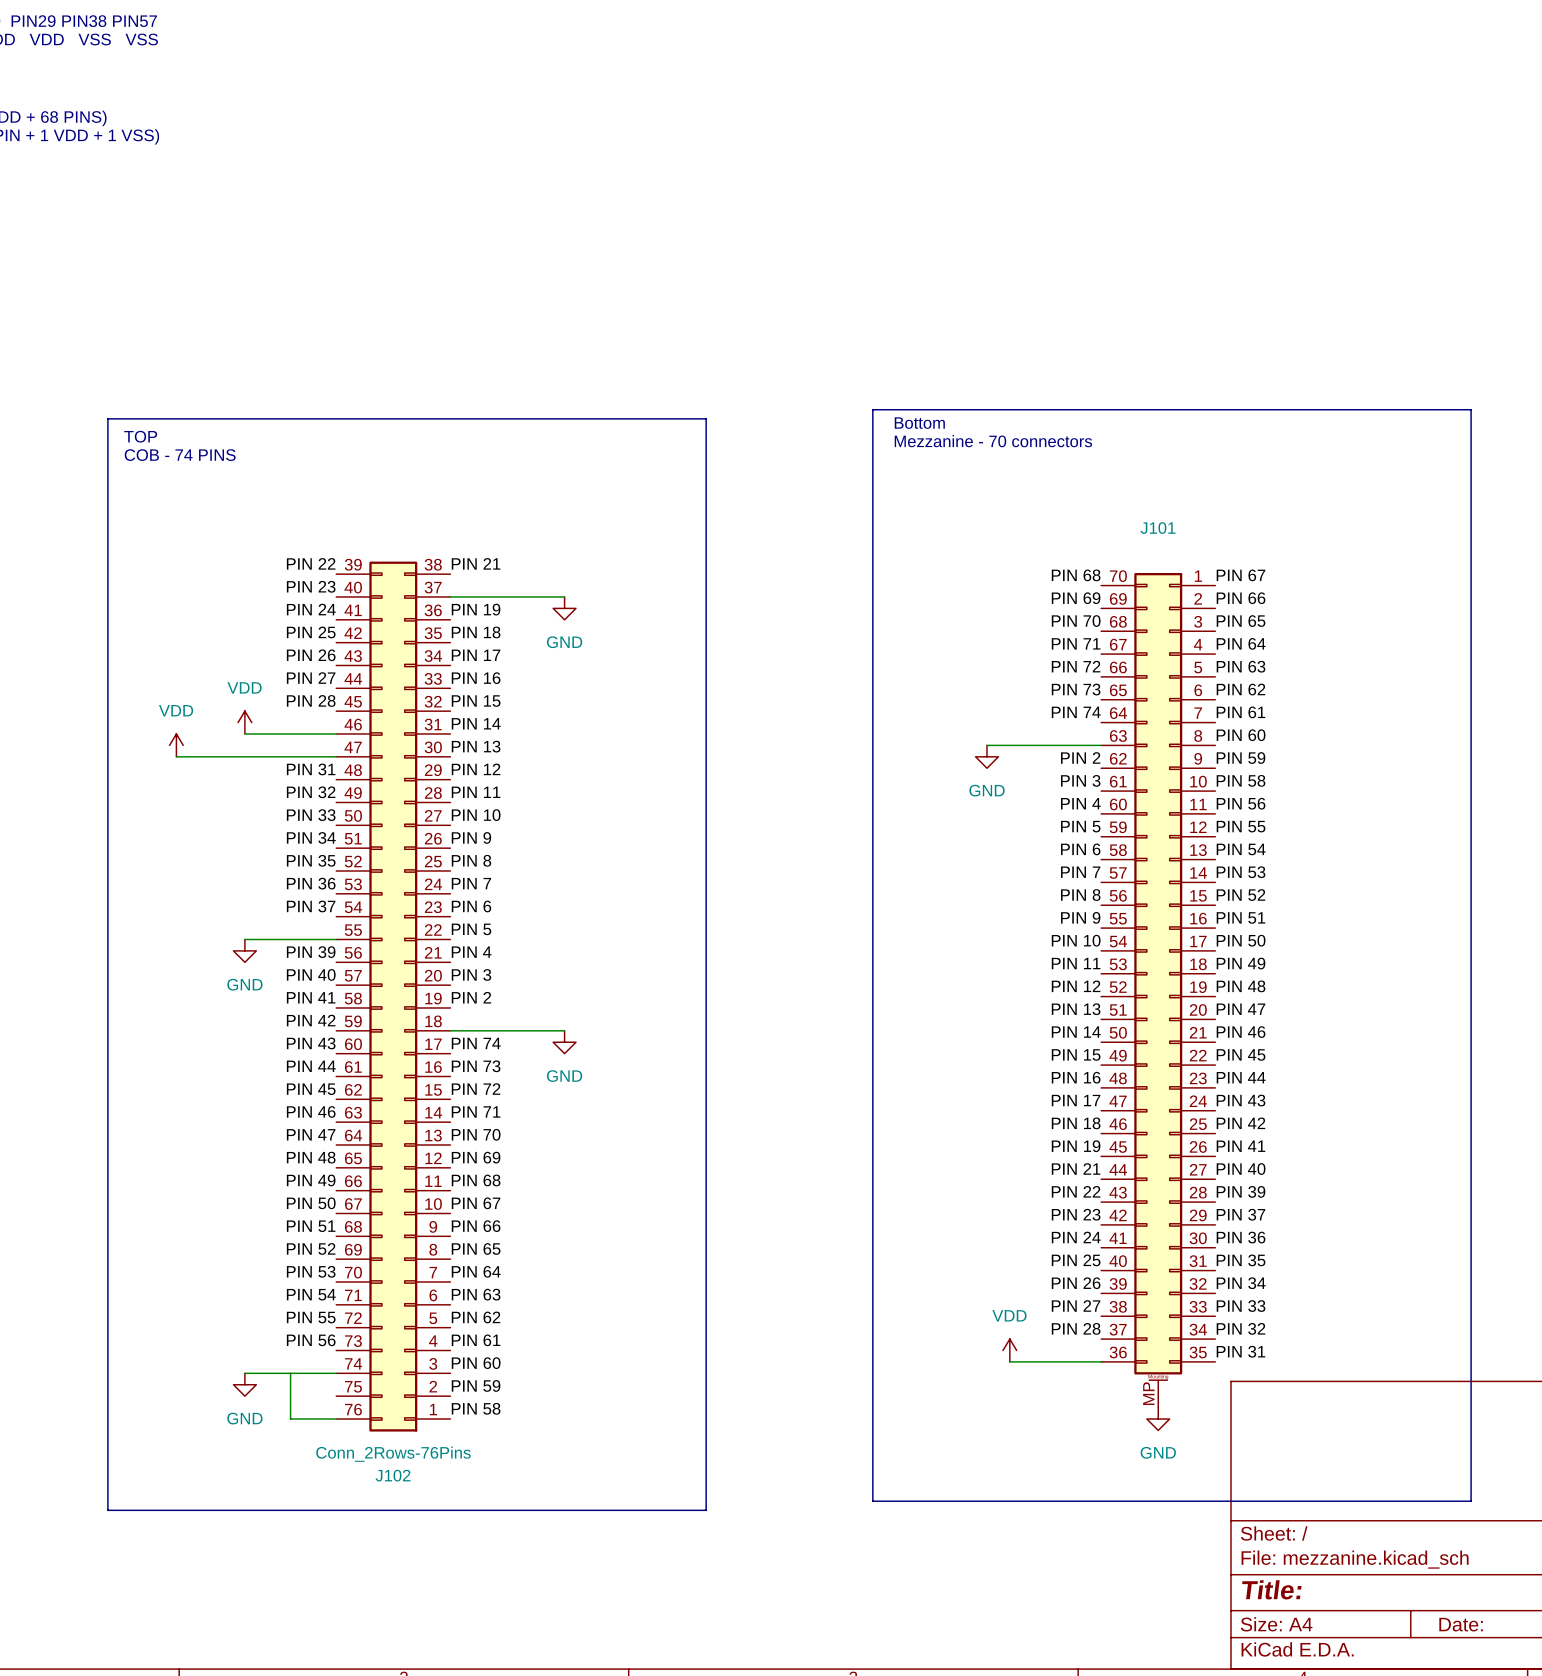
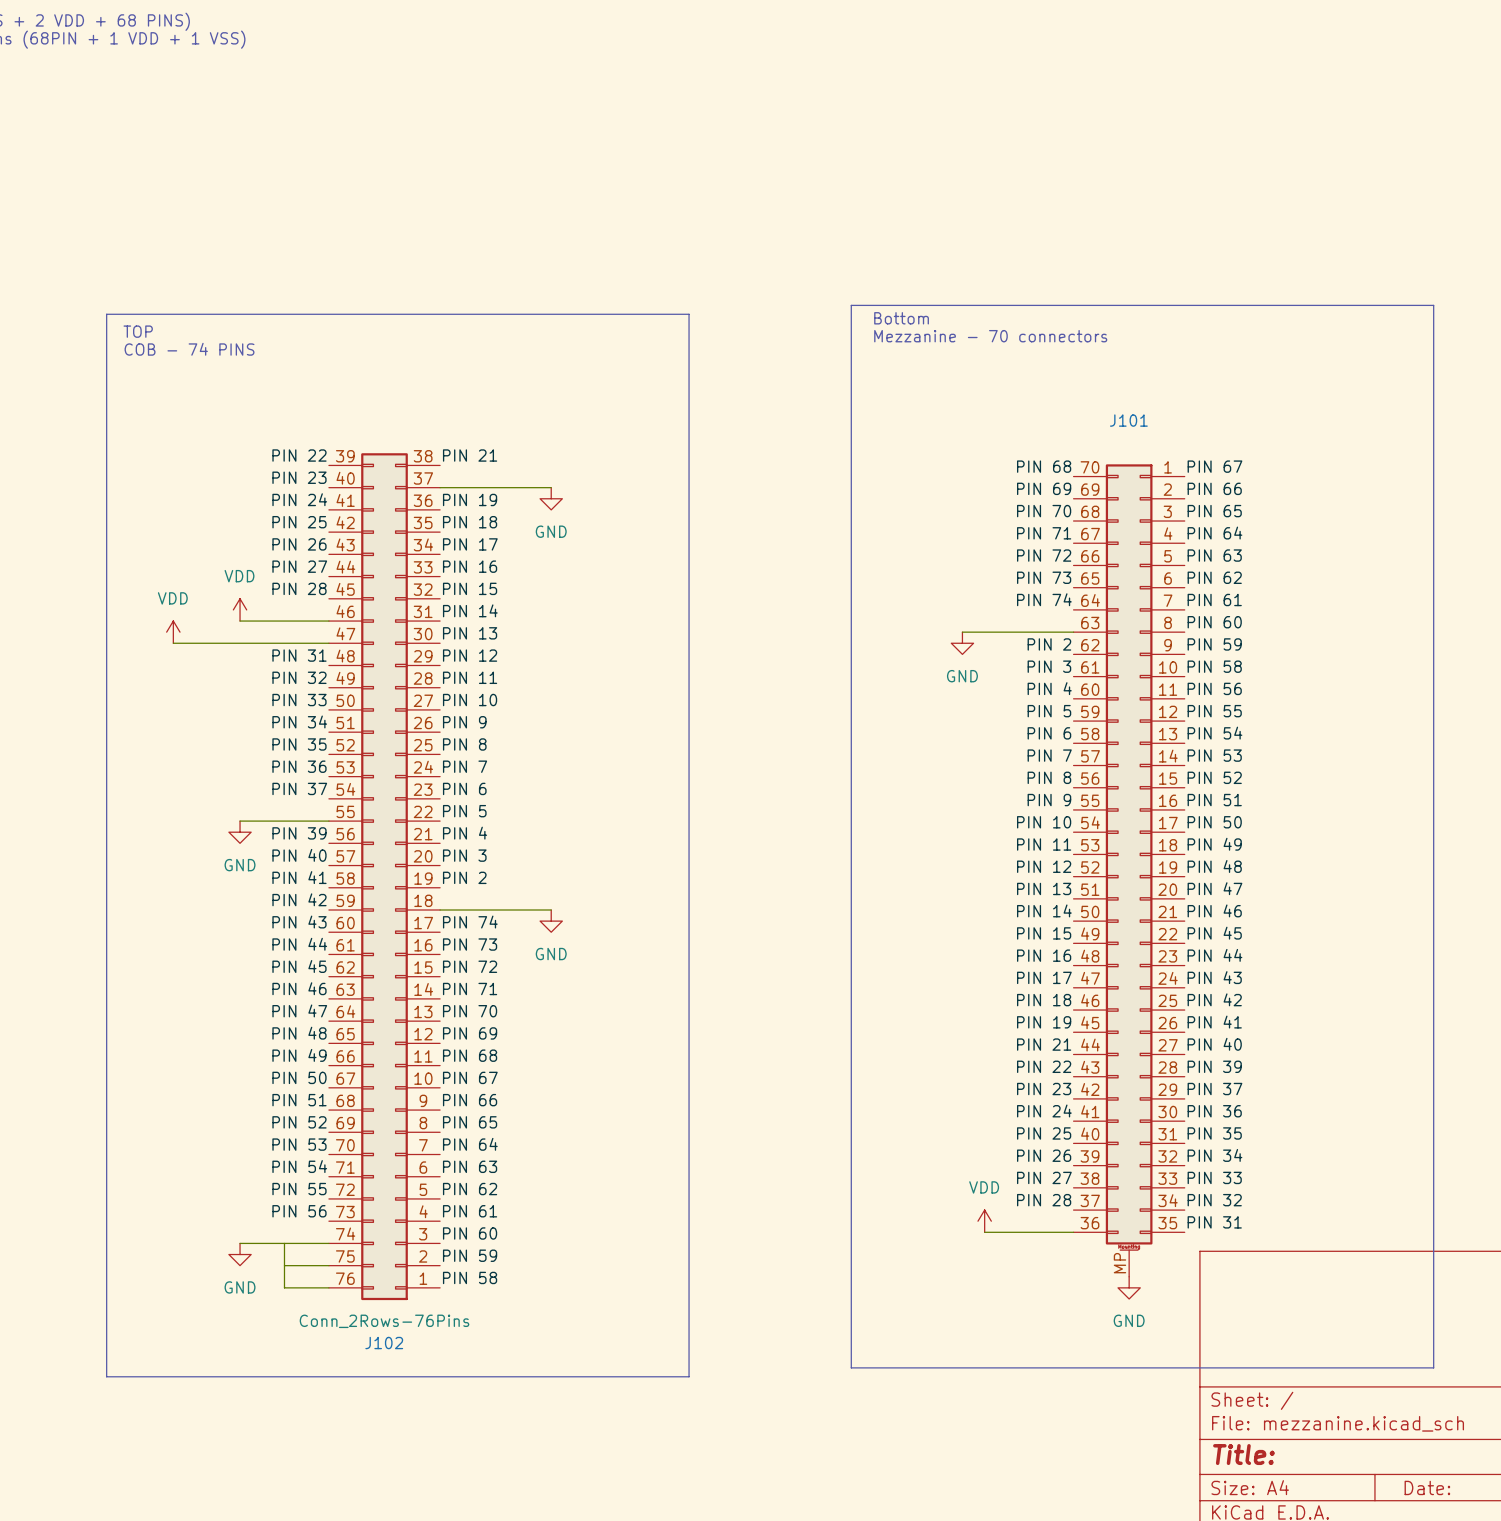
wire: none -> (284, 1265) (328, 1265)

